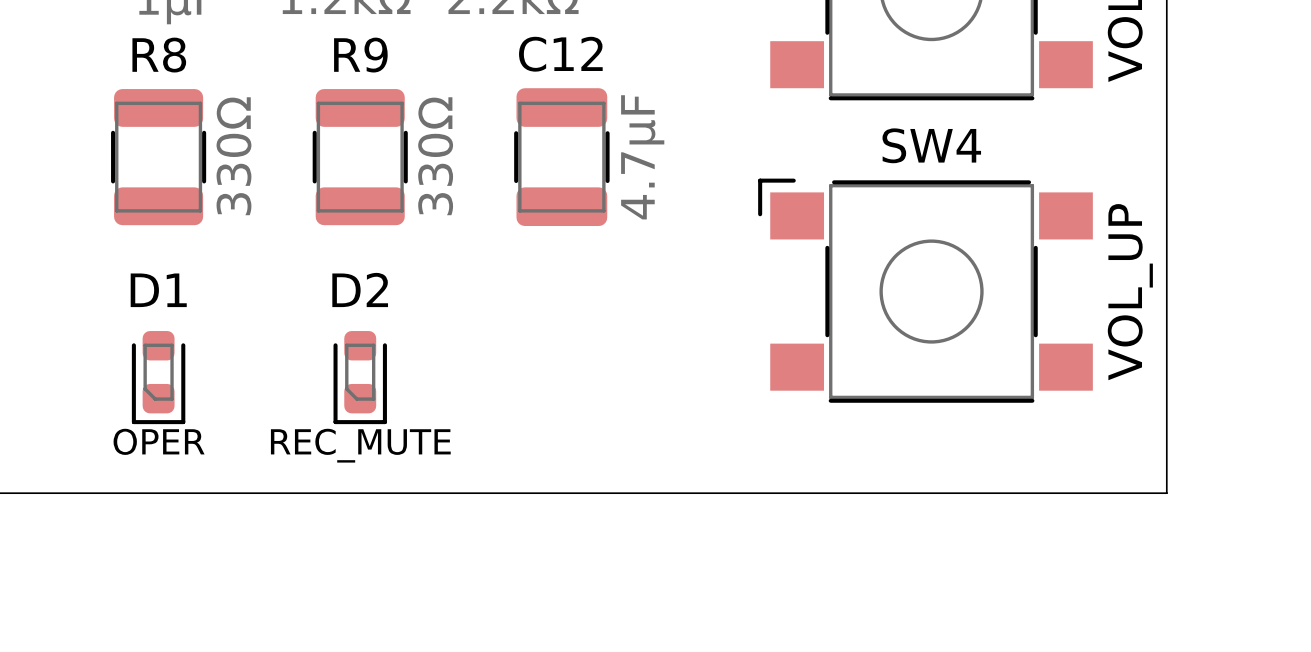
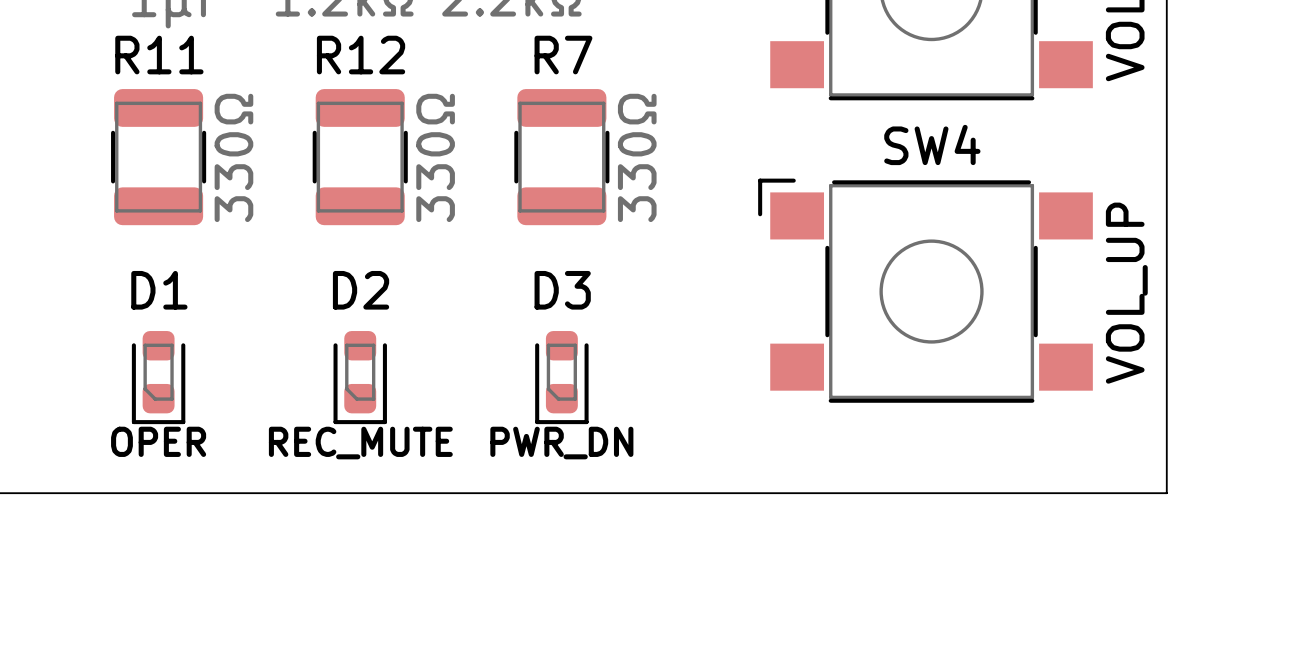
R8 name: R8 (159, 55) -> R11 (159, 55)
R9 name: R9 (360, 55) -> R12 (361, 55)
C12: 4.7μF (561, 157) -> none
R7: none -> 330Ω (561, 157)
D3: none -> PWR_DN (561, 377)

